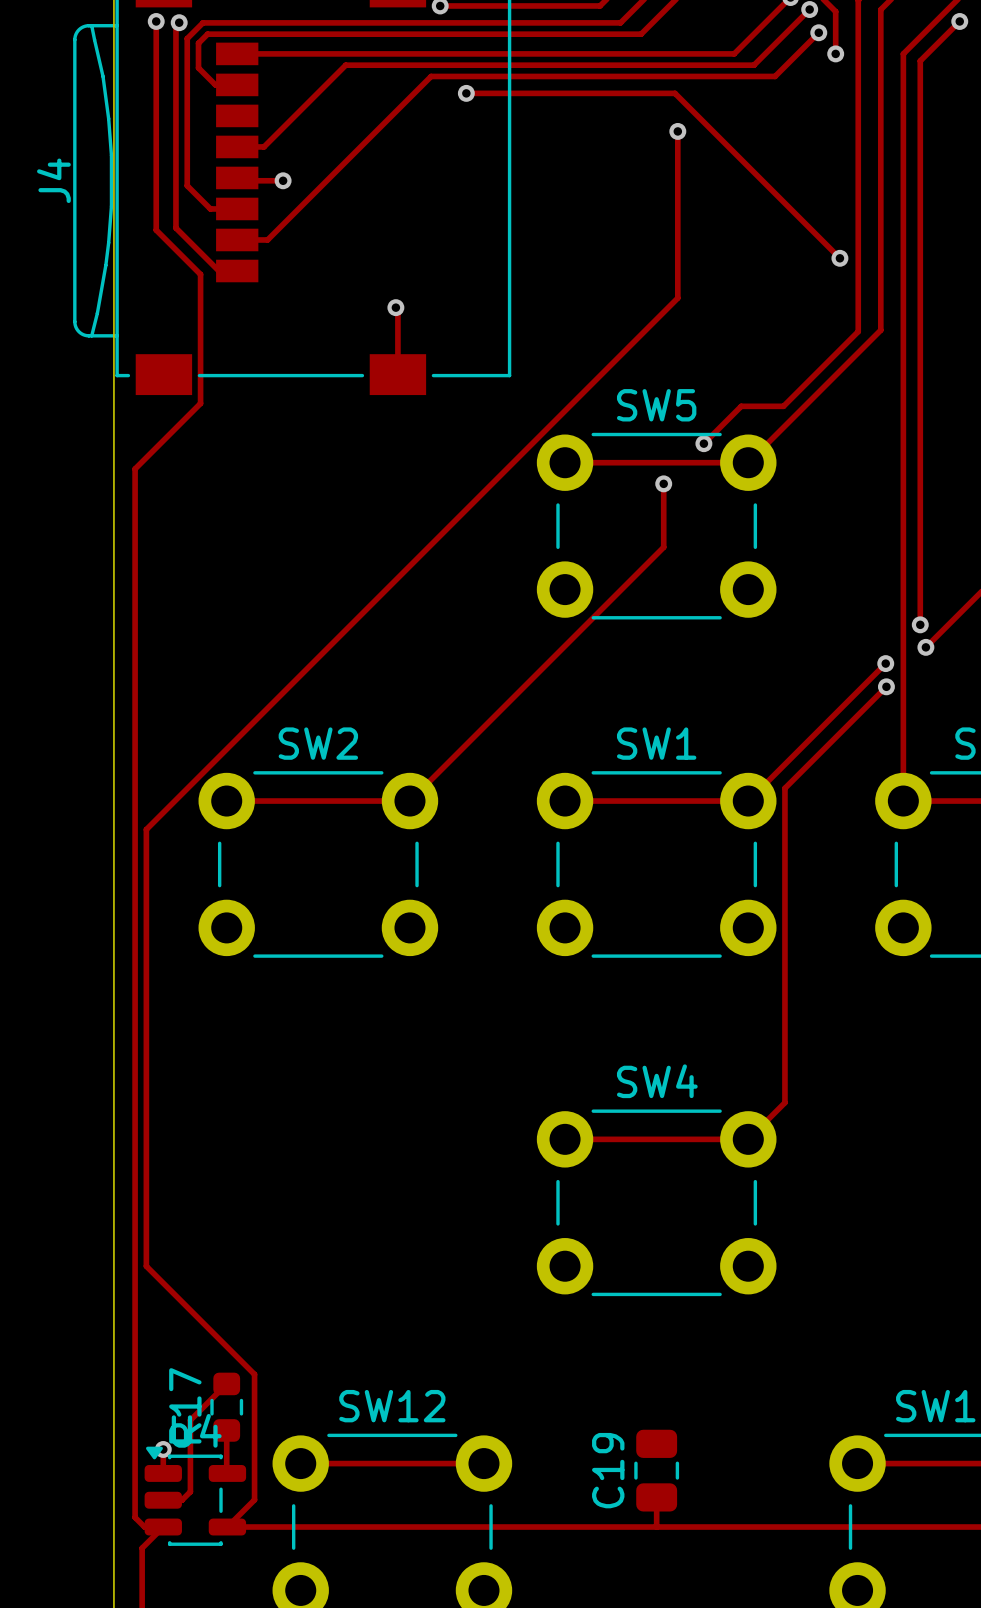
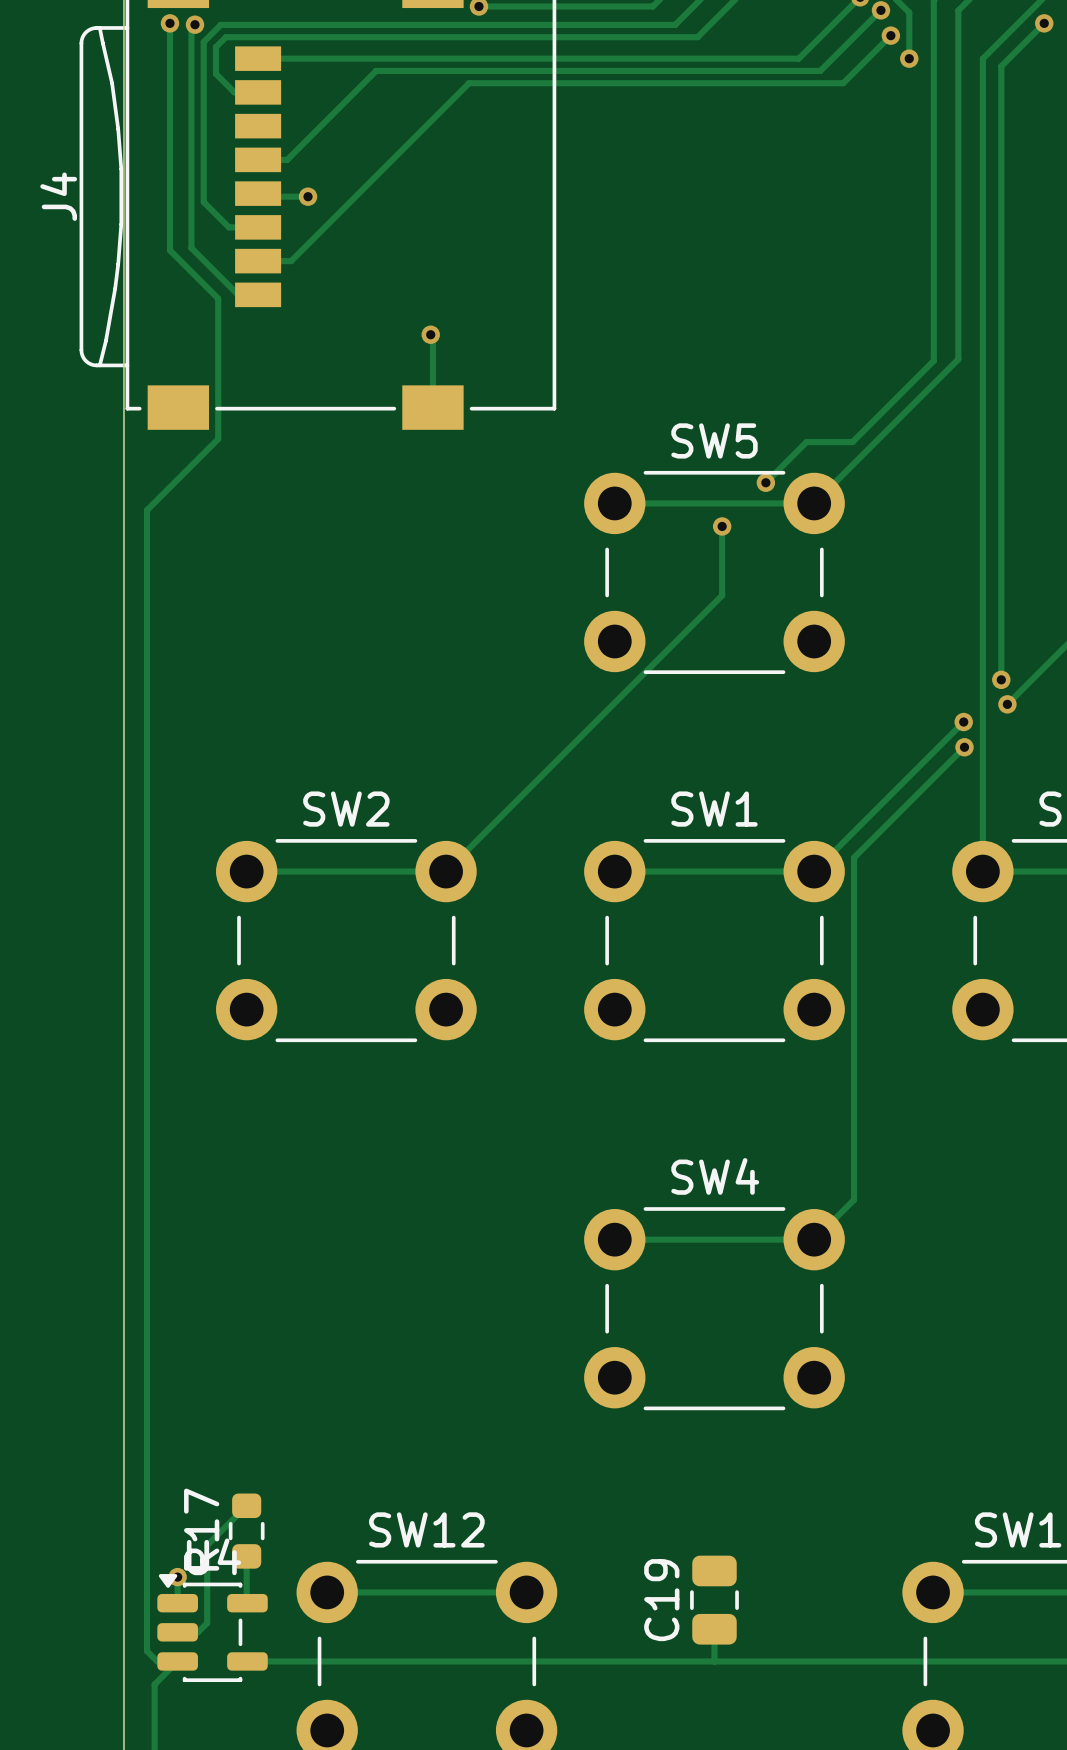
track: (466, 93) (674, 93) (839, 258) -> none
via: (466, 93) -> none
track: (677, 131) (677, 298) (146, 829) (146, 1266) (254, 1374) (254, 1499) (227, 1527) -> none
via: (677, 131) -> none
via: (839, 258) -> none

